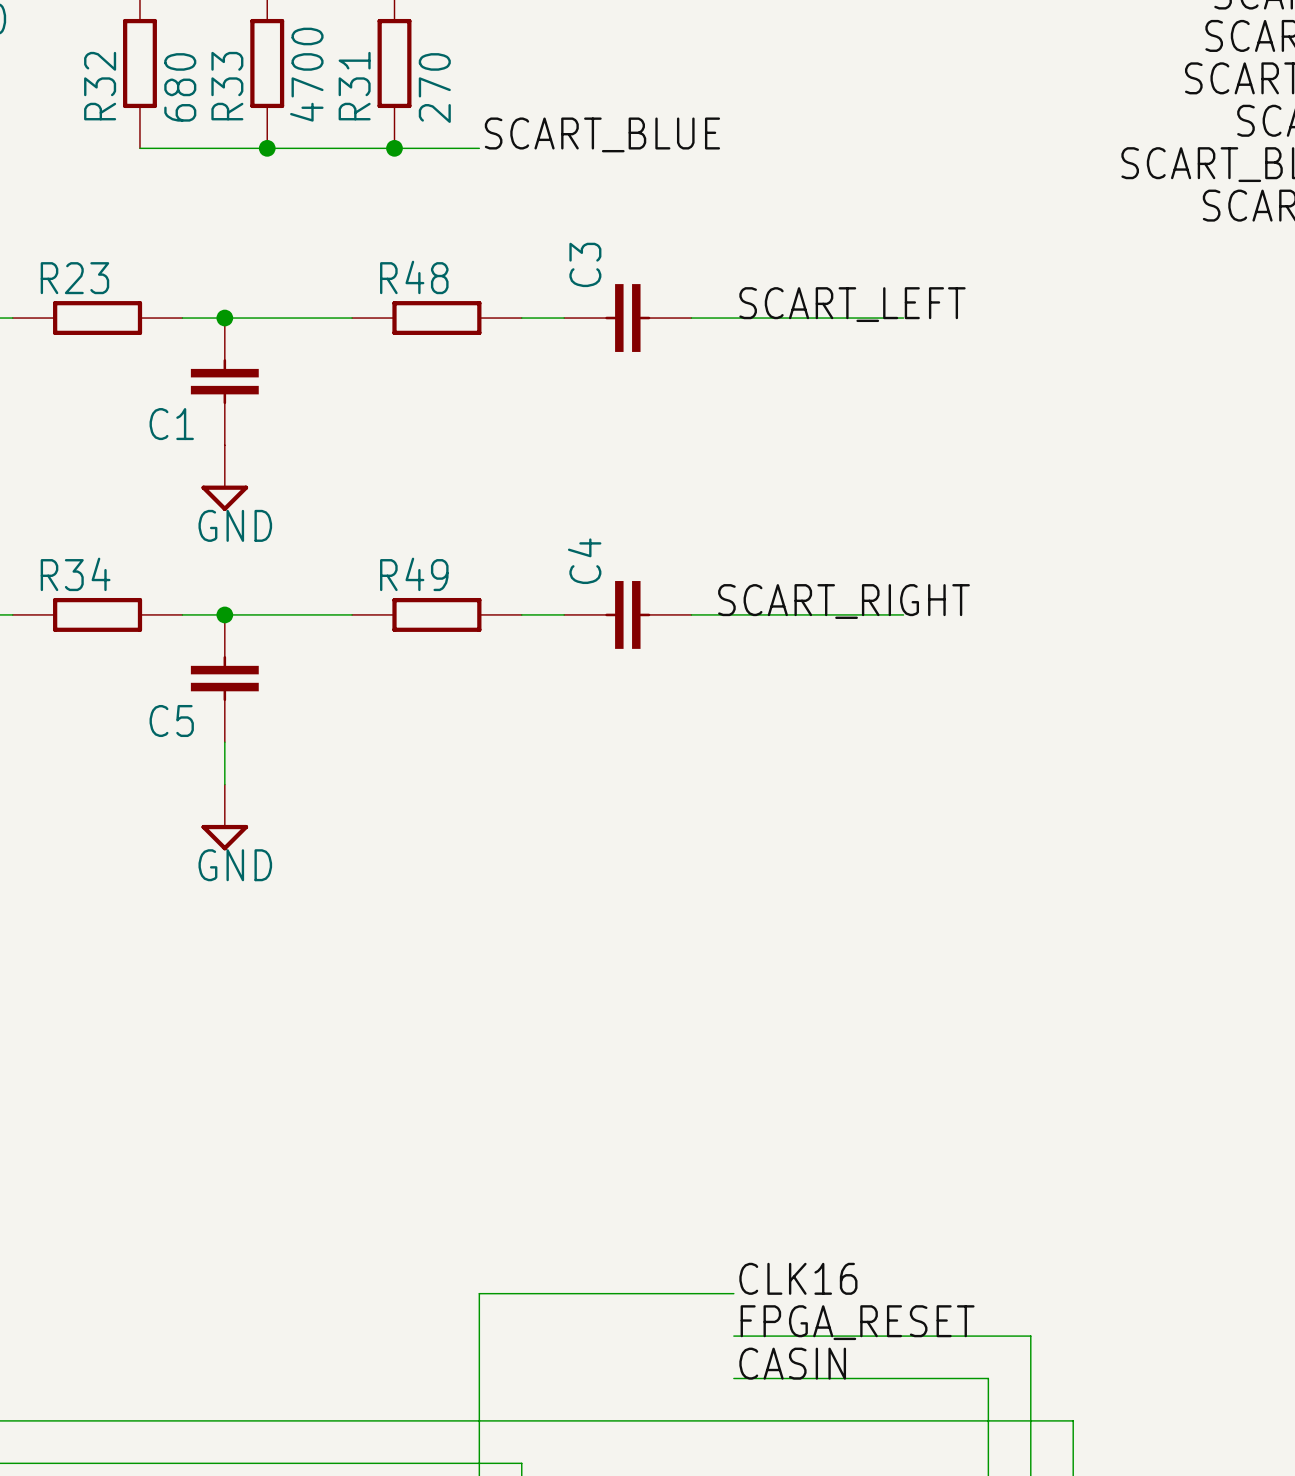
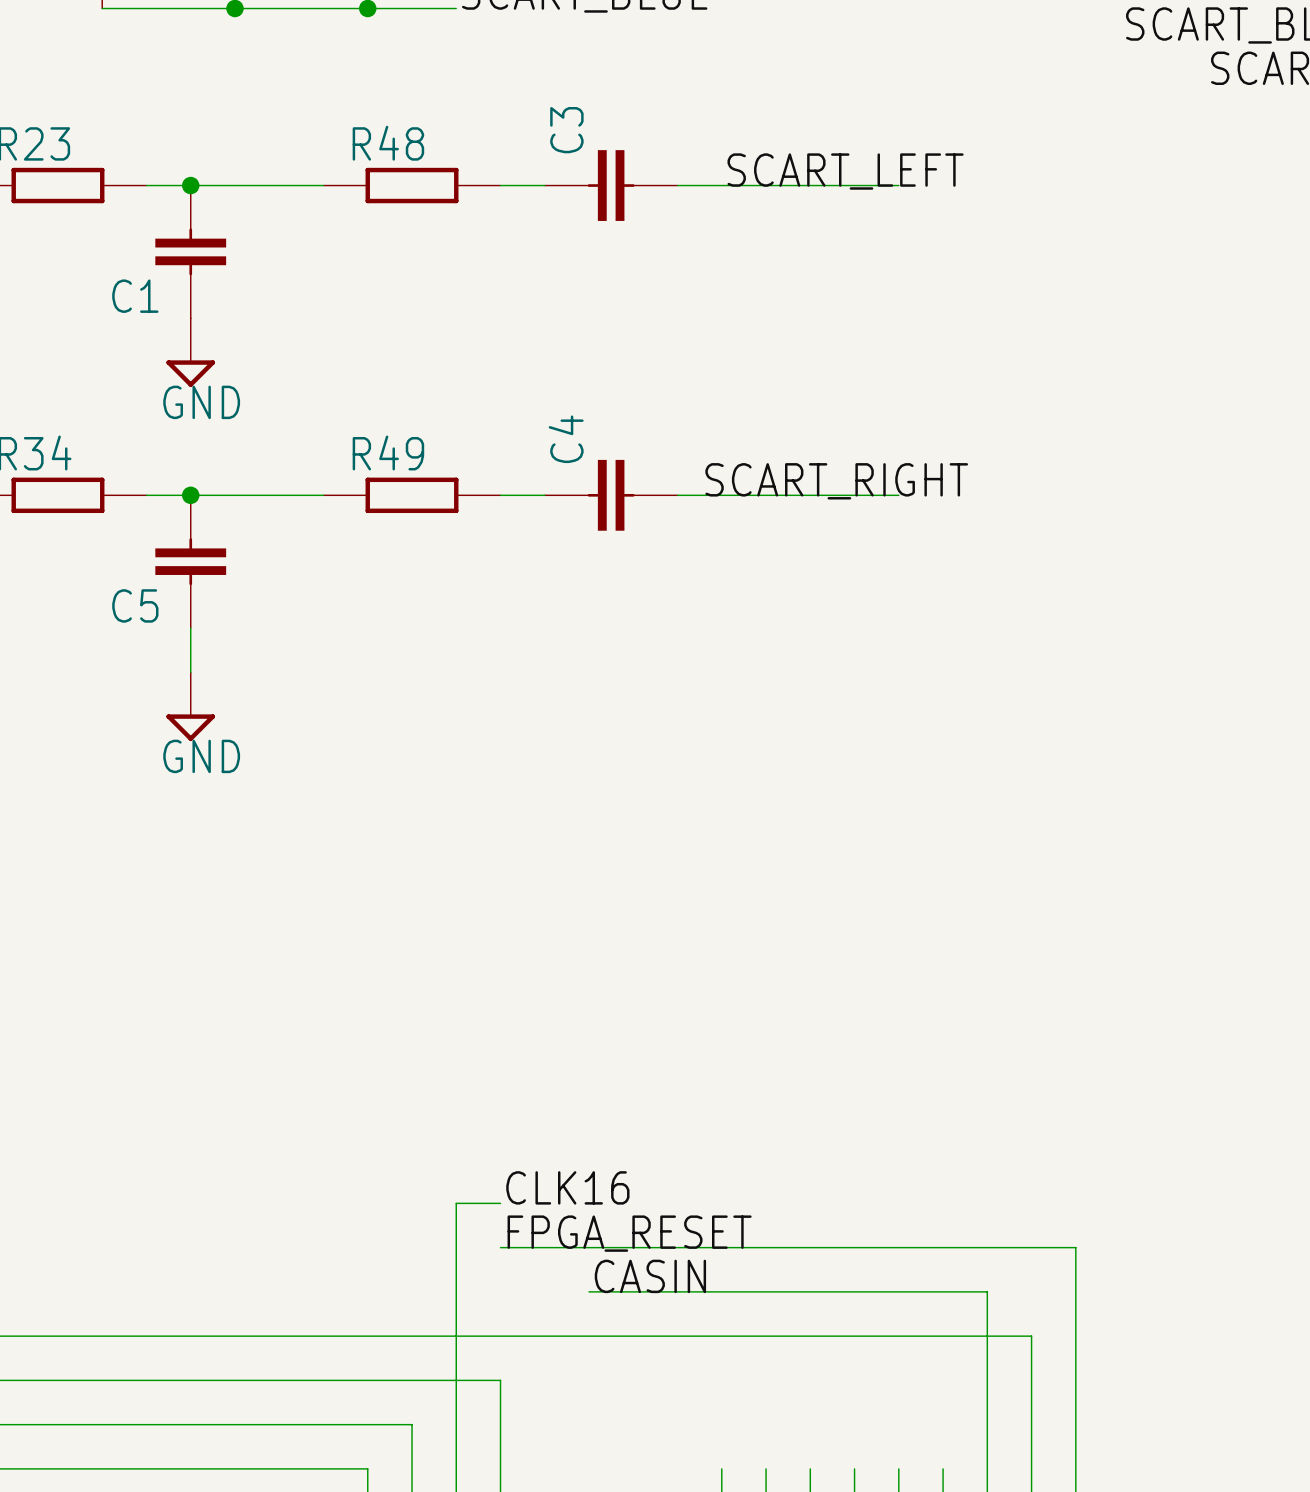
label position: CLK16 (798, 1278) -> CLK16 (567, 1187)
wire: (521, 1293) (733, 1293) -> (500, 1247) (721, 1247)
label position: FPGA_RESET (857, 1322) -> FPGA_RESET (629, 1233)
wire: (1030, 1336) (1030, 1420) (1073, 1420) -> (1031, 1247) (1075, 1247) (1075, 1336)
label position: CASIN (792, 1363) -> CASIN (650, 1276)
wire: none -> (589, 1291) (721, 1291)

